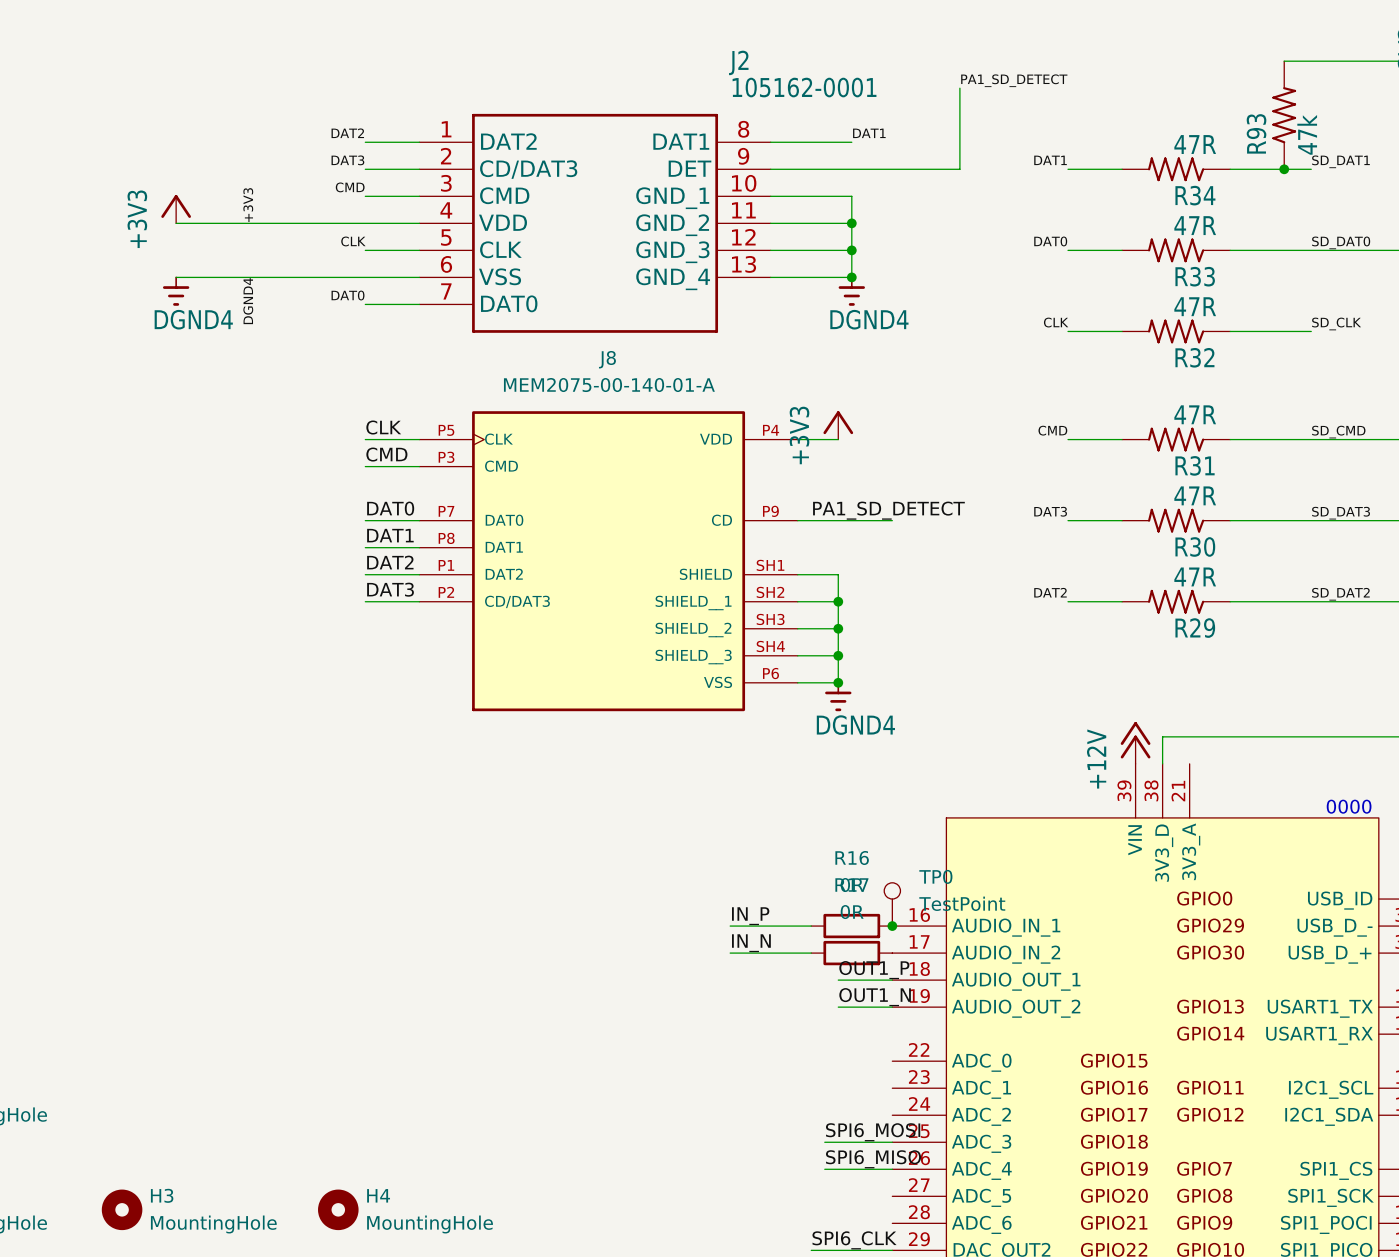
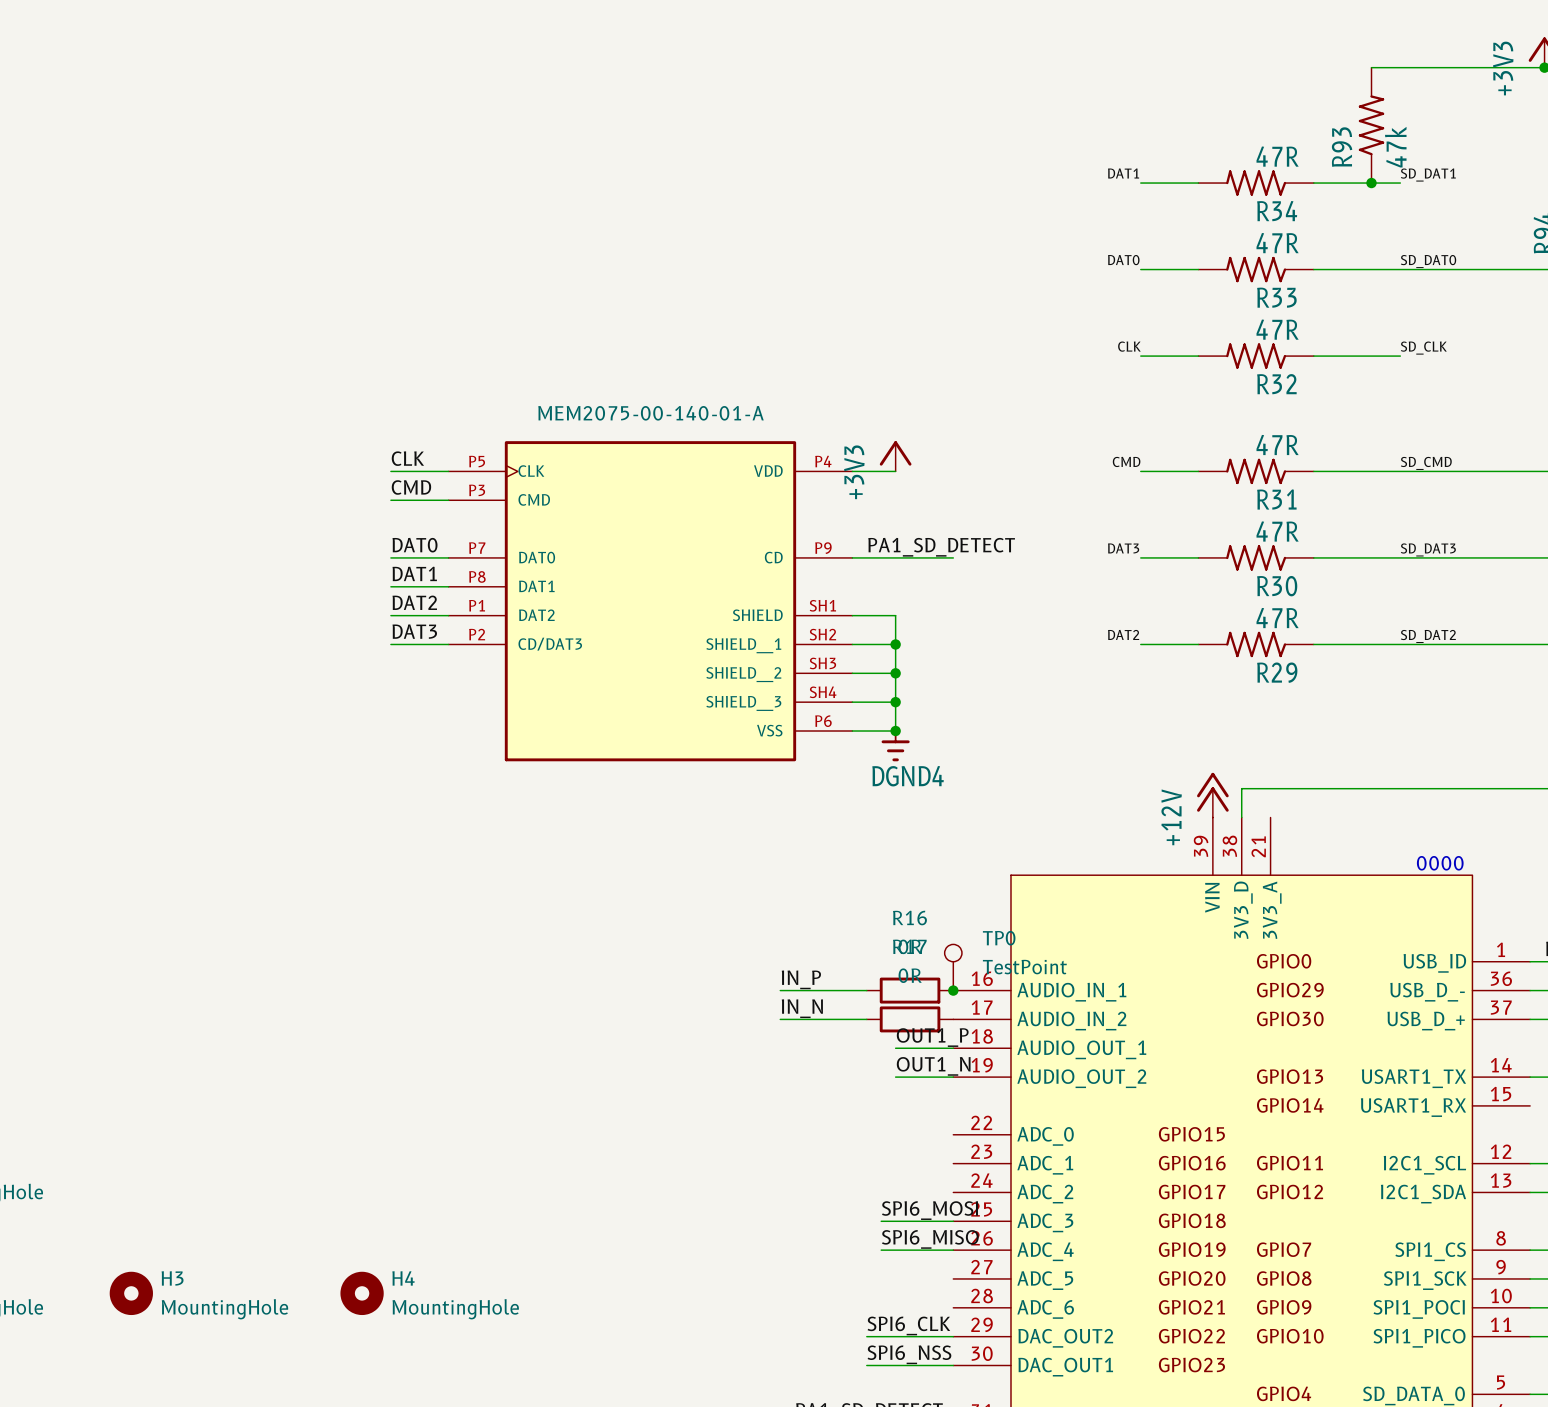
label: PA1_SD_DETECT (1014, 80) -> none
wire: (959, 88) (959, 169) (770, 169) -> none
label: DAT2 (347, 133) -> none
label: DAT1 (869, 133) -> none
wire: (365, 142) (419, 142) -> none
wire: (770, 142) (851, 142) -> none
label: DAT3 (347, 160) -> none
wire: (365, 169) (419, 169) -> none
label: CMD (350, 187) -> none
wire: (365, 196) (419, 196) -> none
wire: (770, 196) (851, 196) (851, 277) (770, 277) -> none
label: +3V3 (248, 205) -> none
power symbol: +3V3 (176, 209) -> none
wire: (176, 223) (419, 223) -> none
J2: 105162-0001 (595, 223) -> none
wire: (770, 223) (851, 223) -> none
junction: (851, 223) -> none
label: CLK (353, 241) -> none
wire: (365, 250) (419, 250) -> none
wire: (770, 250) (851, 250) -> none
junction: (851, 250) -> none
wire: (176, 277) (419, 277) -> none
junction: (851, 277) -> none
power symbol: DGND4 (176, 291) -> none
power symbol: DGND4 (851, 291) -> none
label: DAT0 (348, 295) -> none
label: DGND4 (248, 301) -> none
wire: (365, 304) (419, 304) -> none
J8 name: J8 (607, 359) -> none

